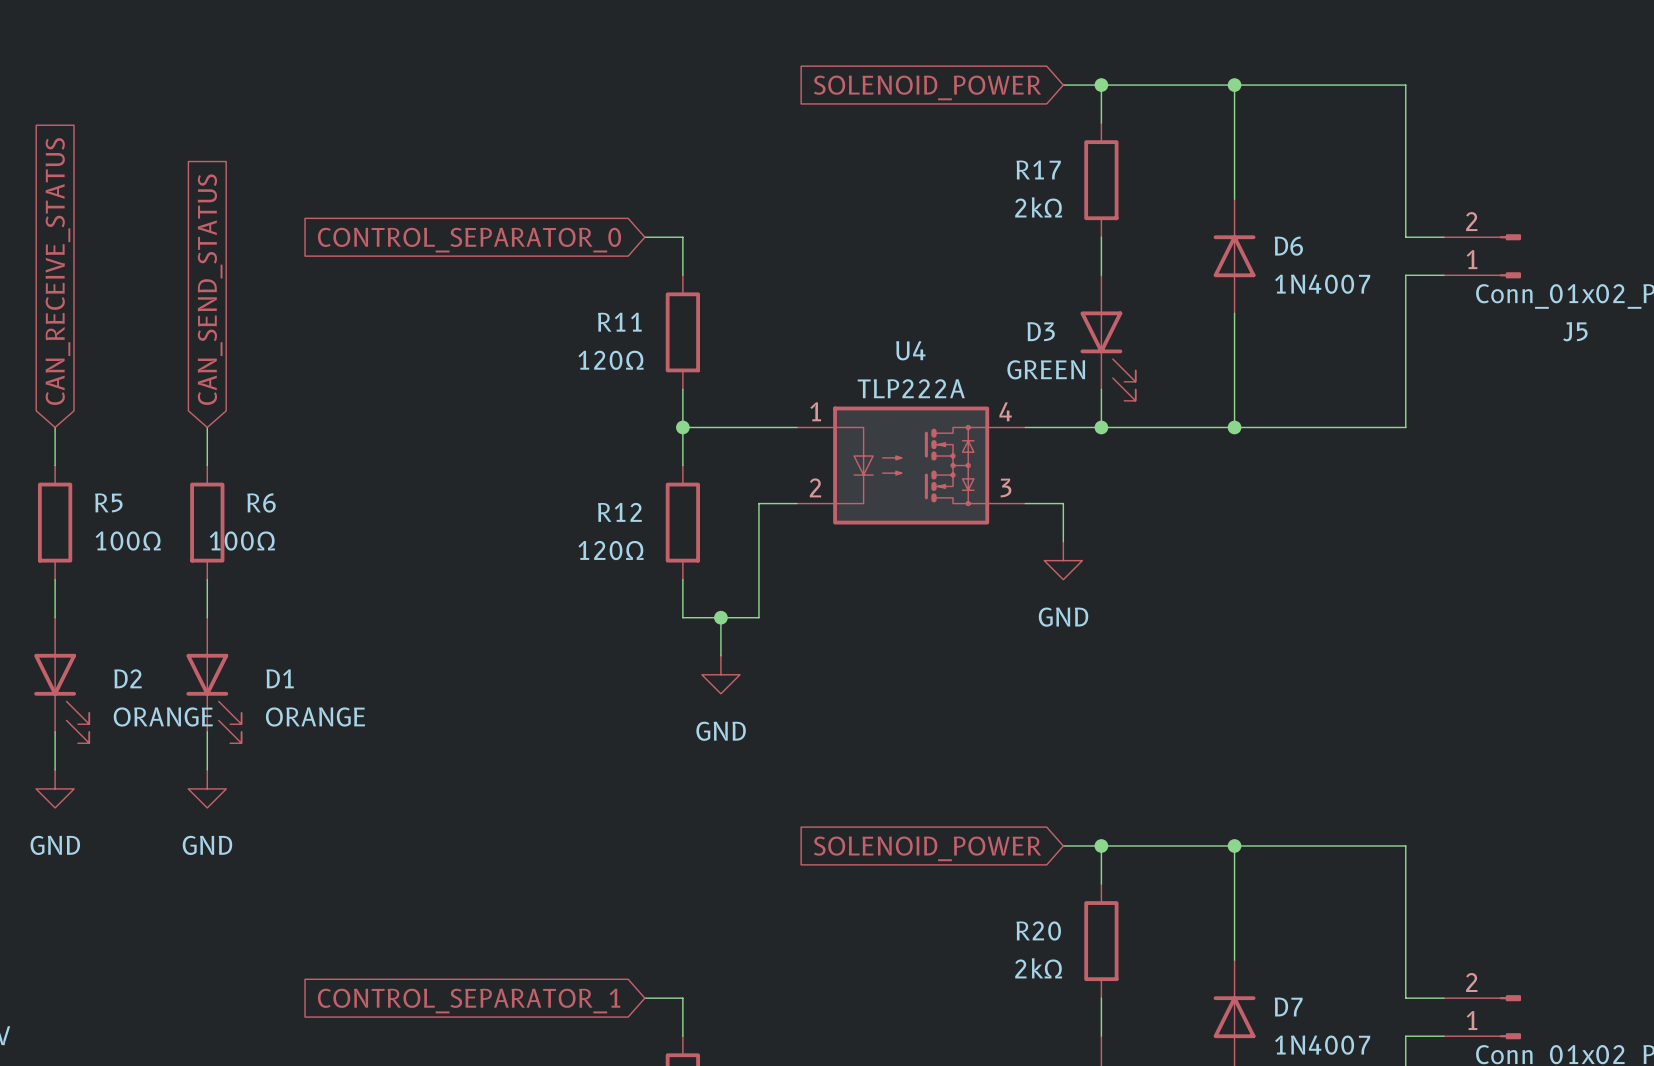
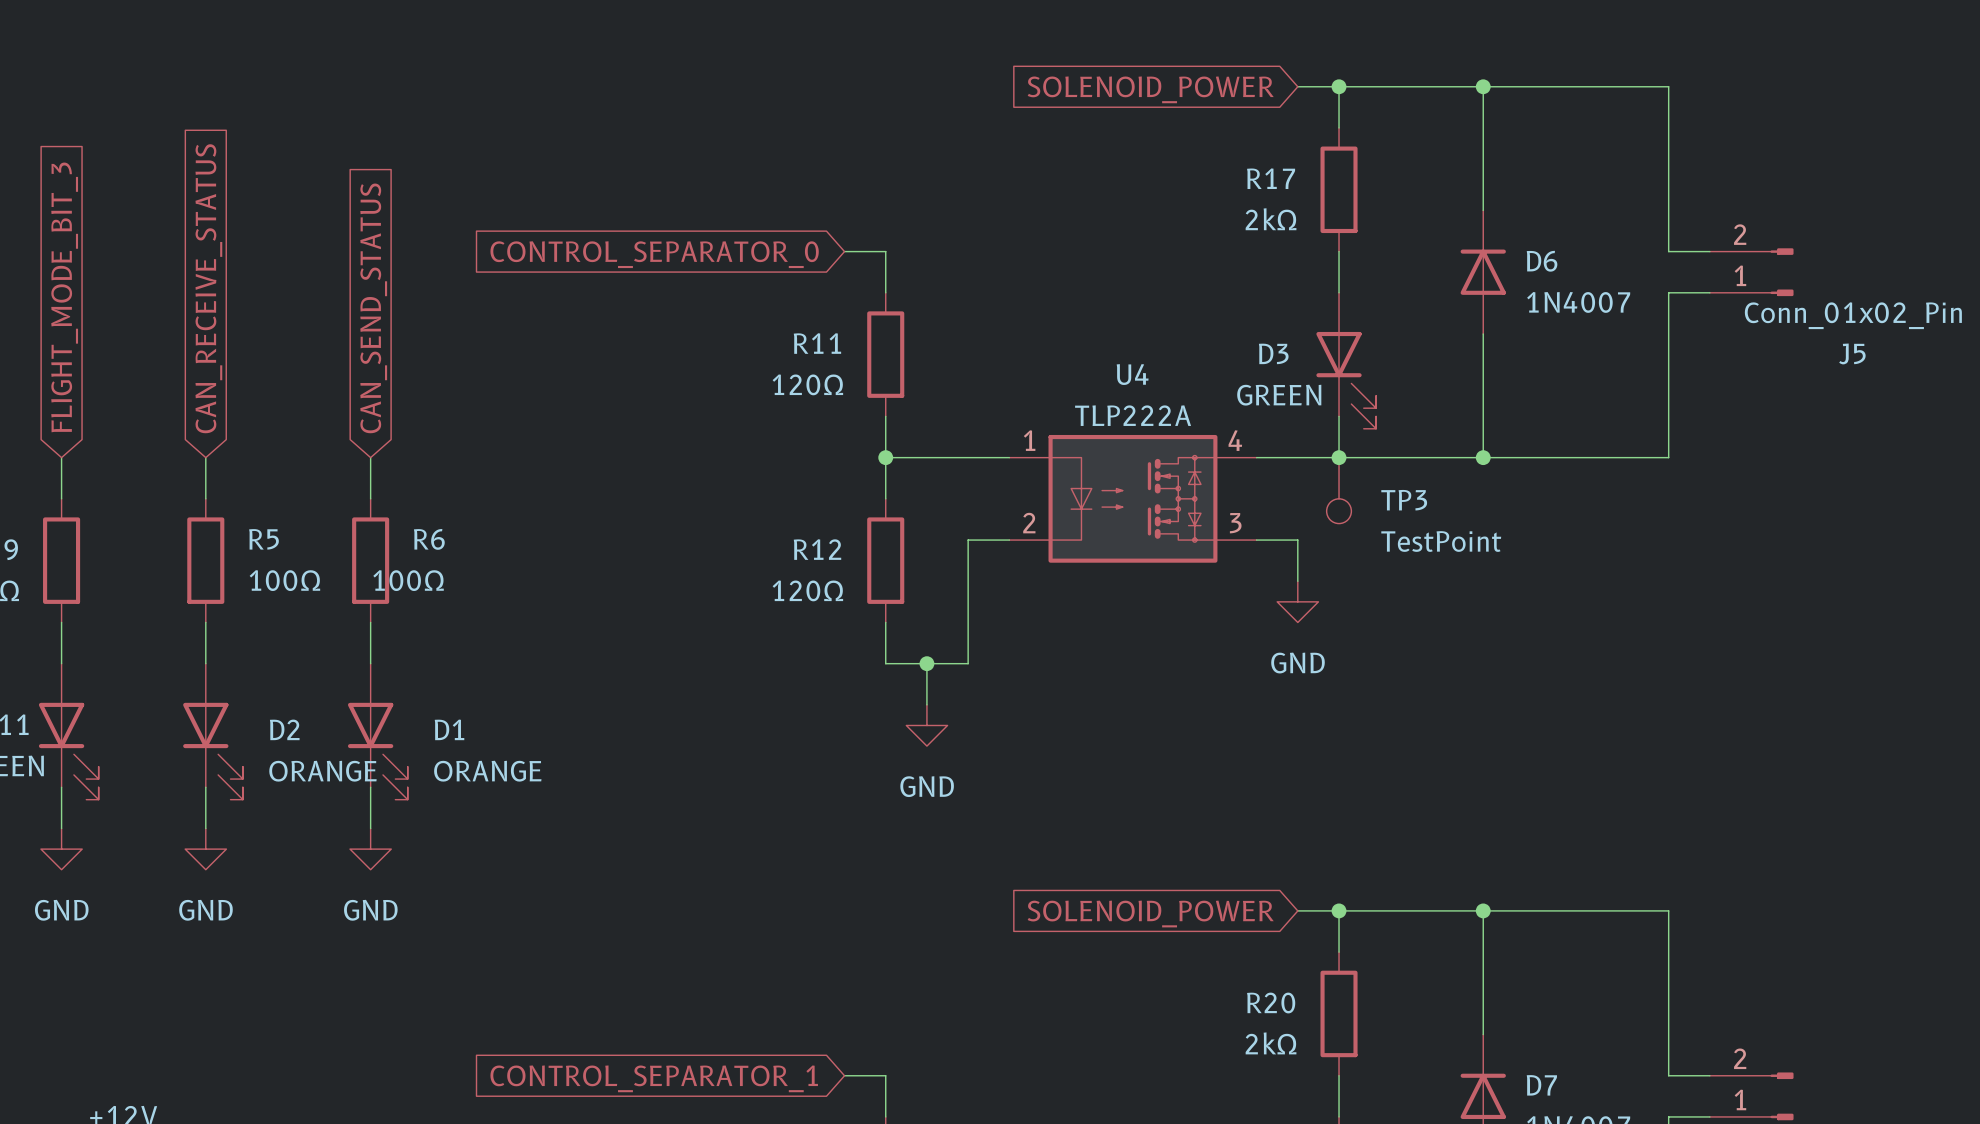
TP3: none -> TestPoint (1339, 490)

